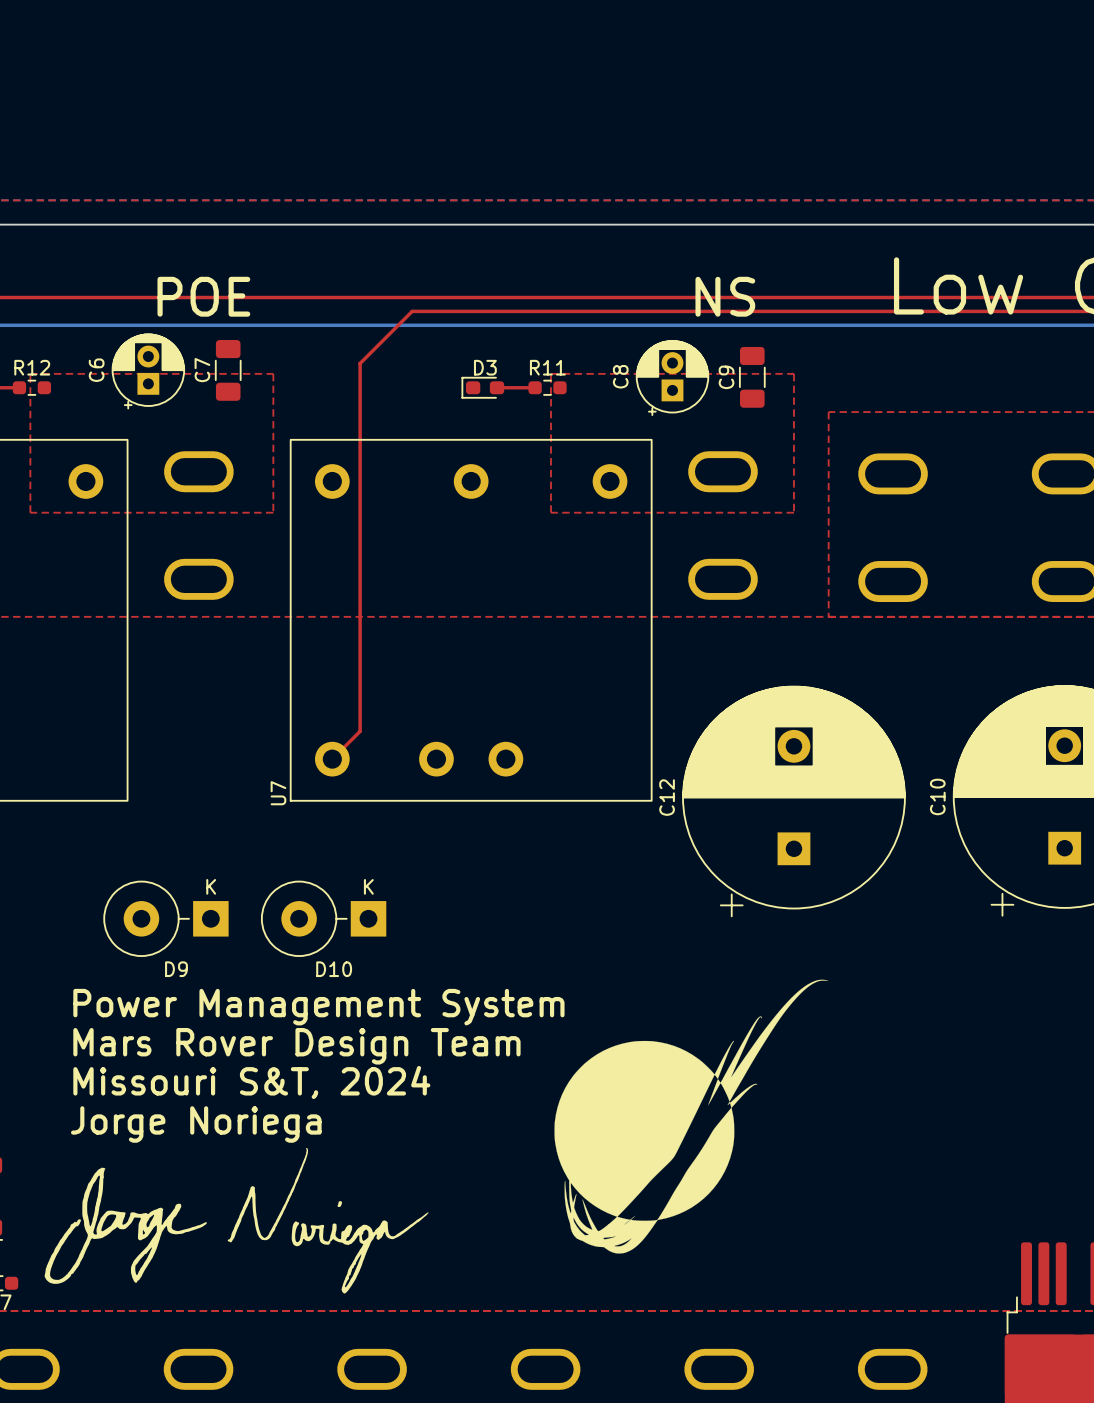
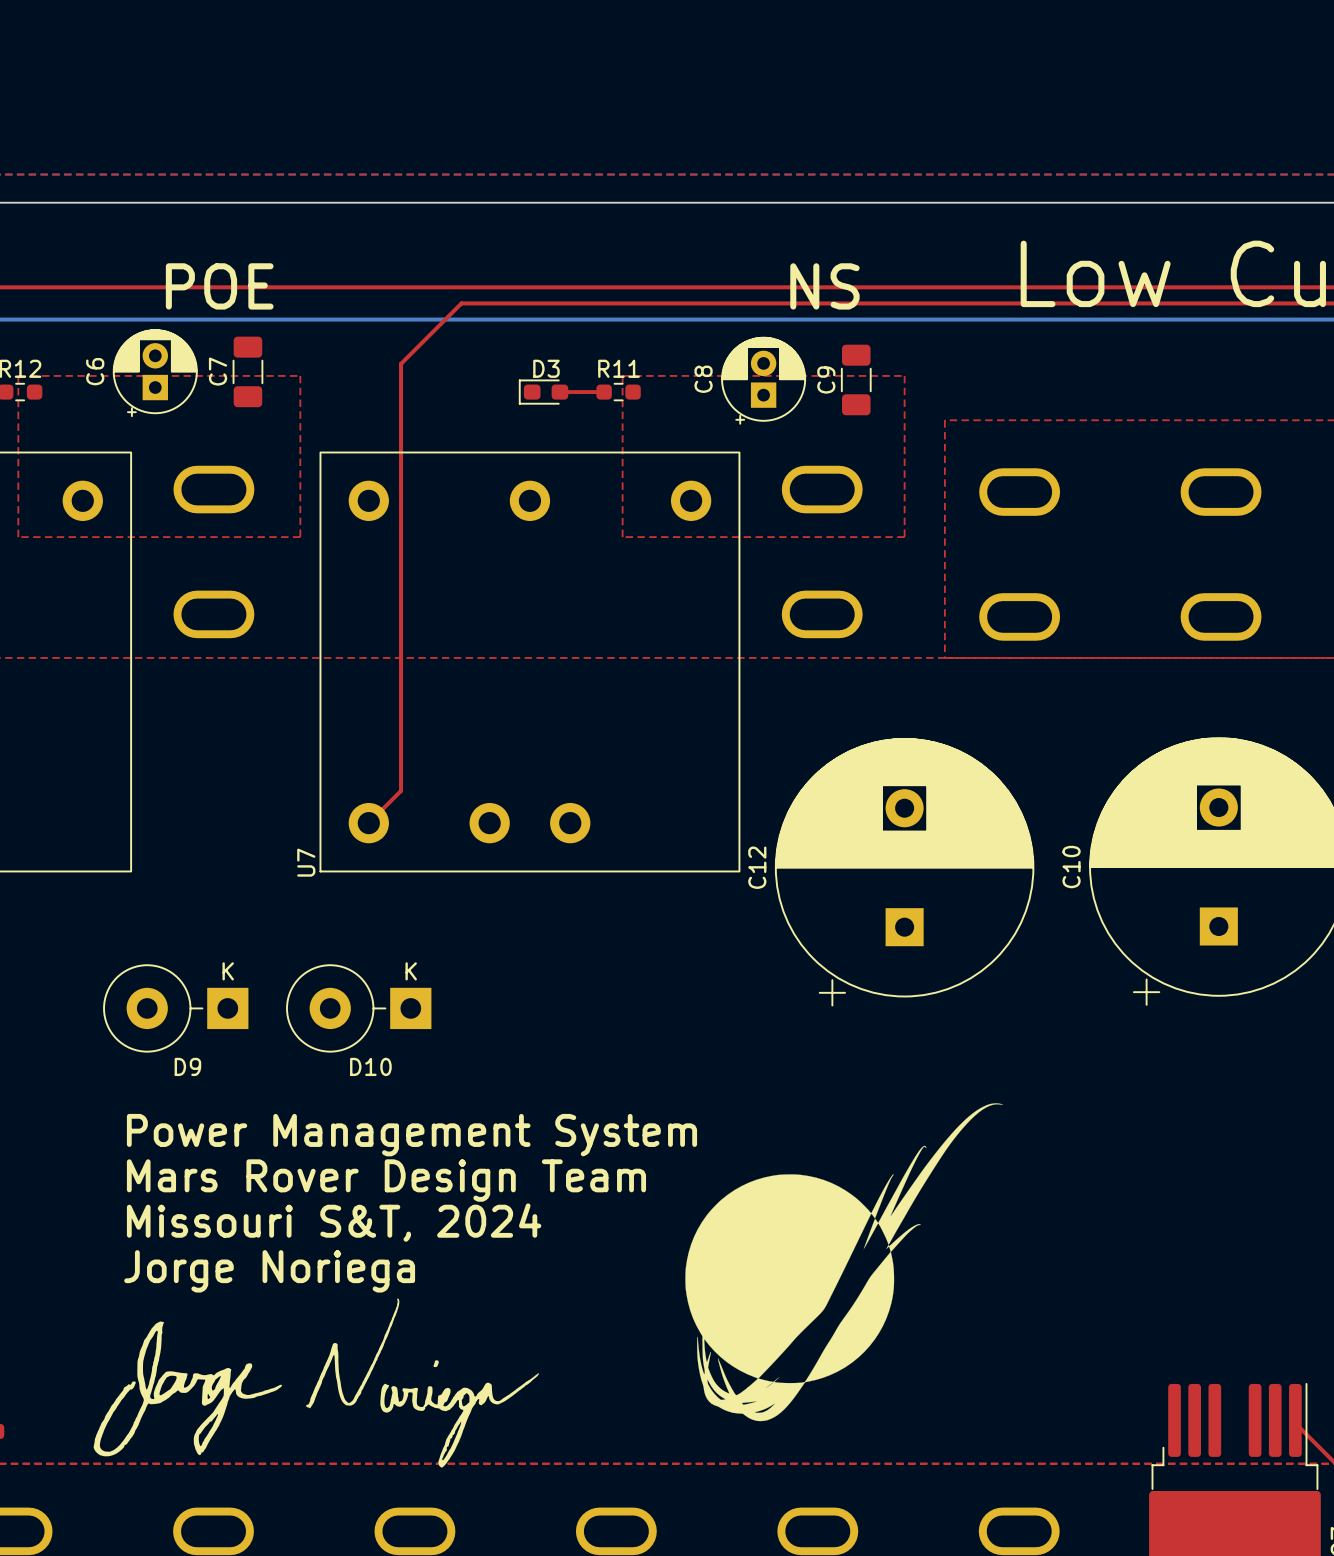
text position: Power Management System (318, 1007) -> Power Management System (411, 1135)
text position: Mars Rover Design Team (296, 1046) -> Mars Rover Design Team (386, 1180)
text position: Missouri S&T, 2024 (251, 1082) -> Missouri S&T, 2024 (334, 1222)
drawing position: (691, 1116) -> (844, 1262)
text position: Jorge Noriega (196, 1124) -> Jorge Noriega (269, 1271)
drawing position: (236, 1220) -> (316, 1383)

